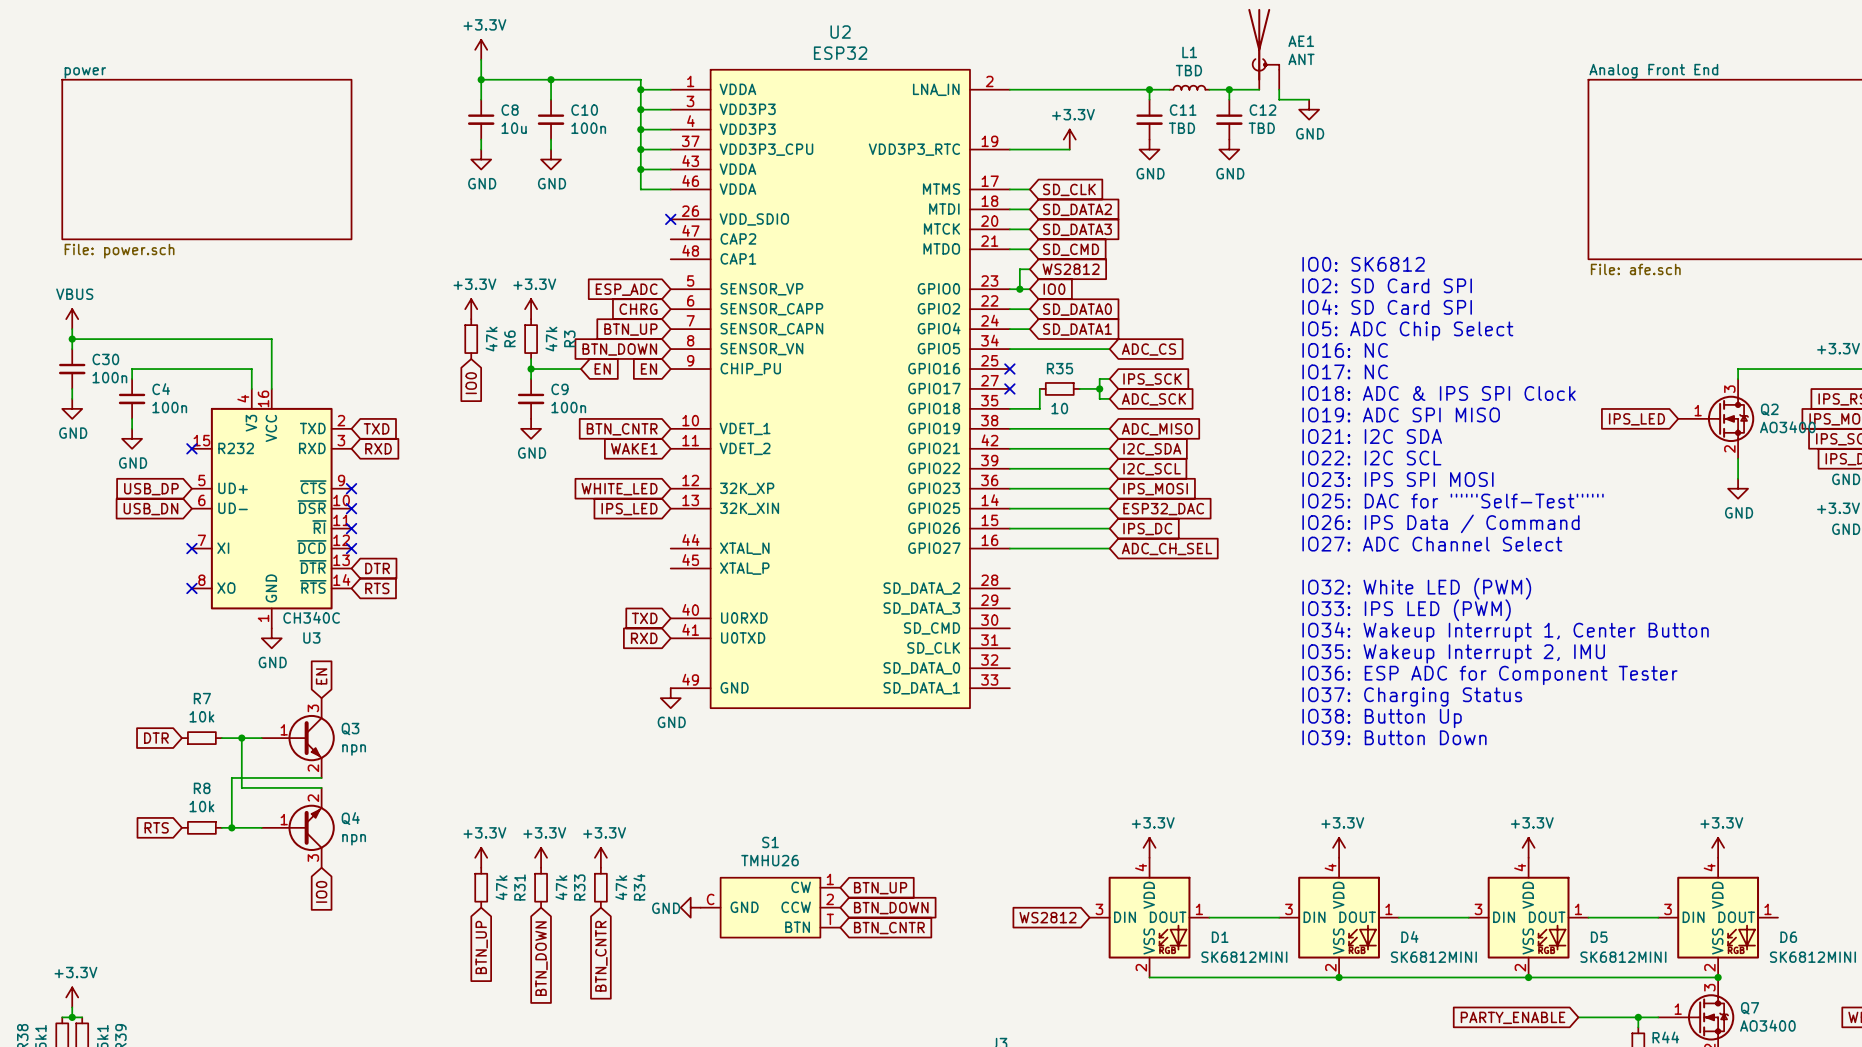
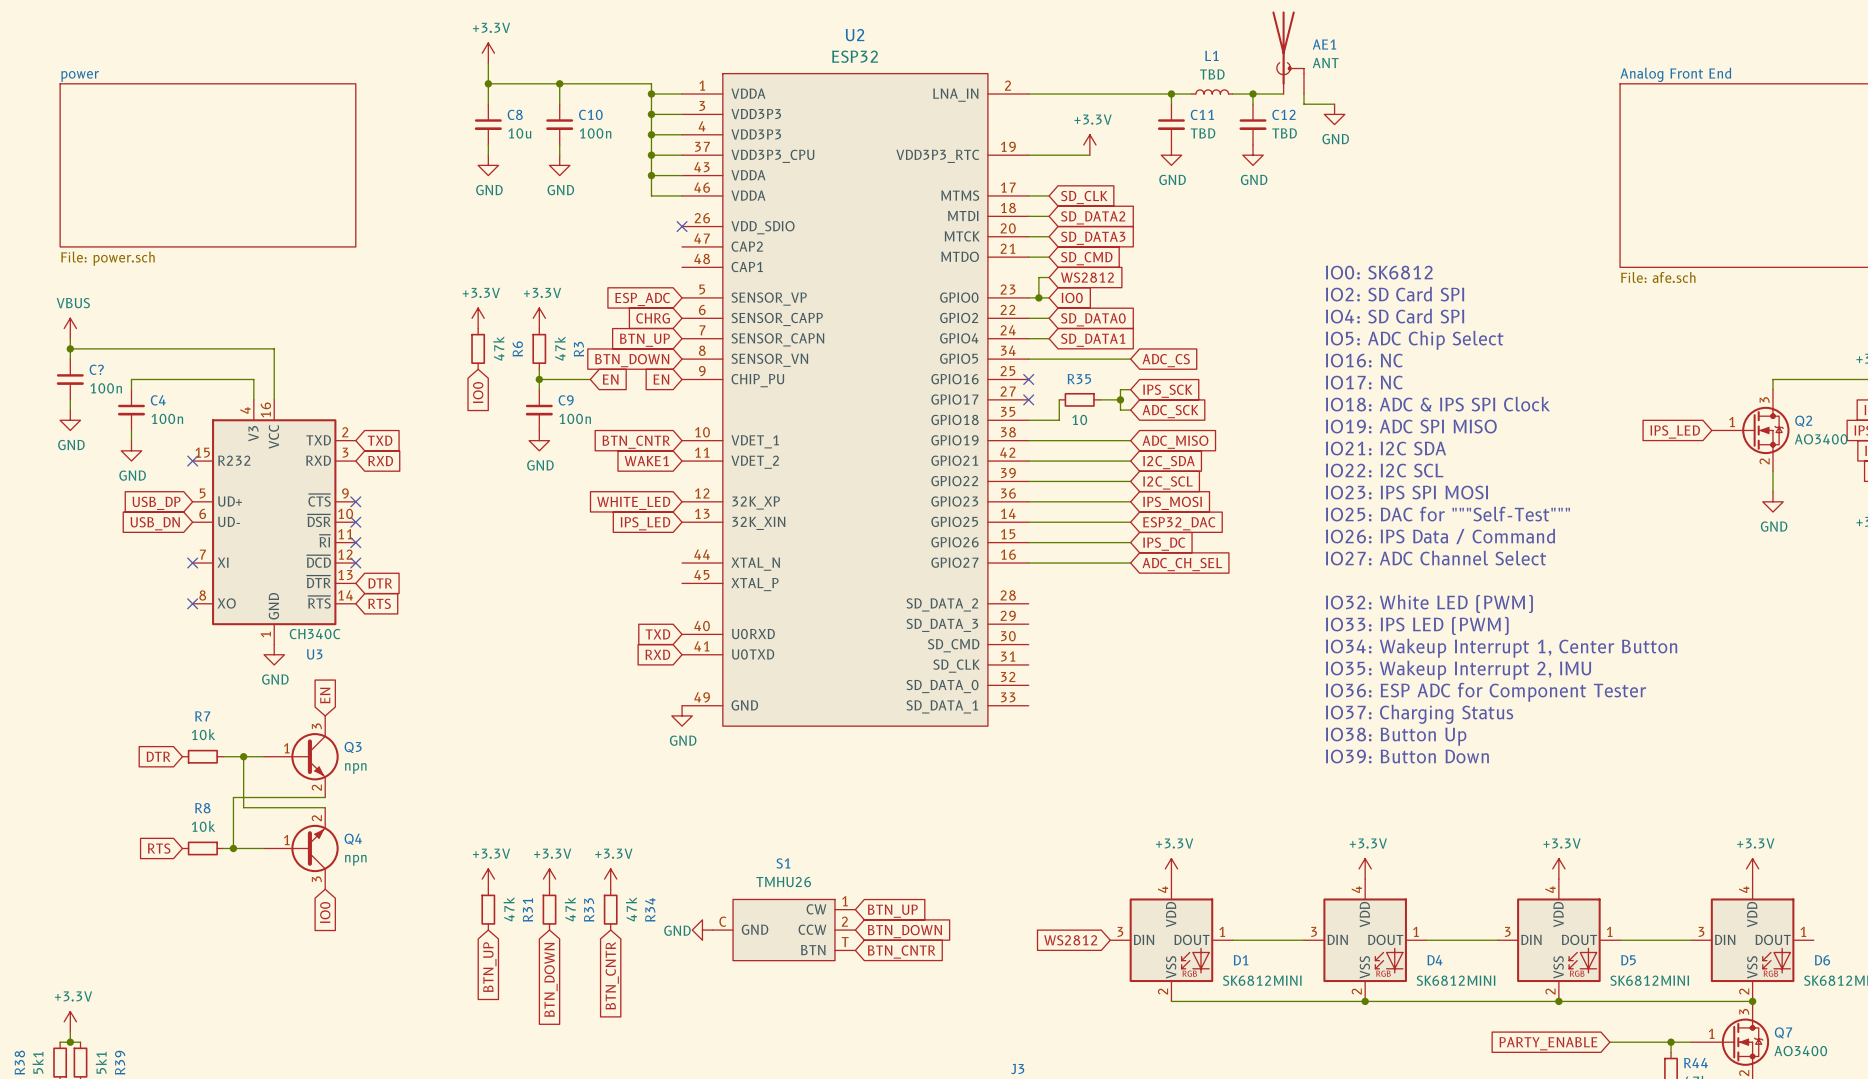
C30 name: C30 (105, 359) -> C? (96, 369)

